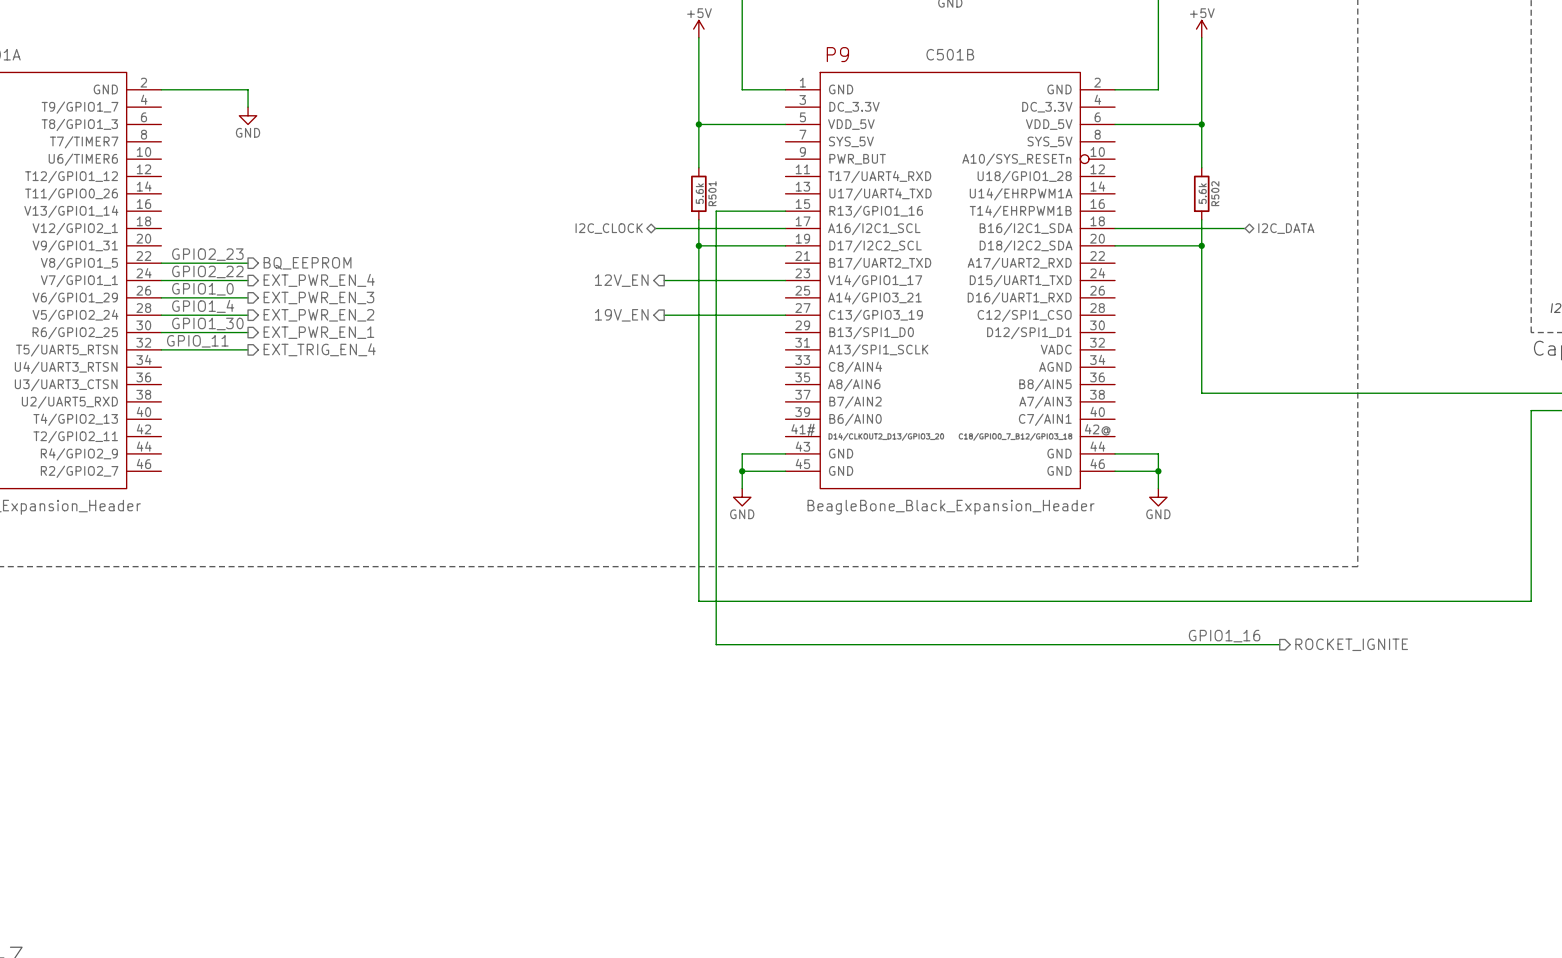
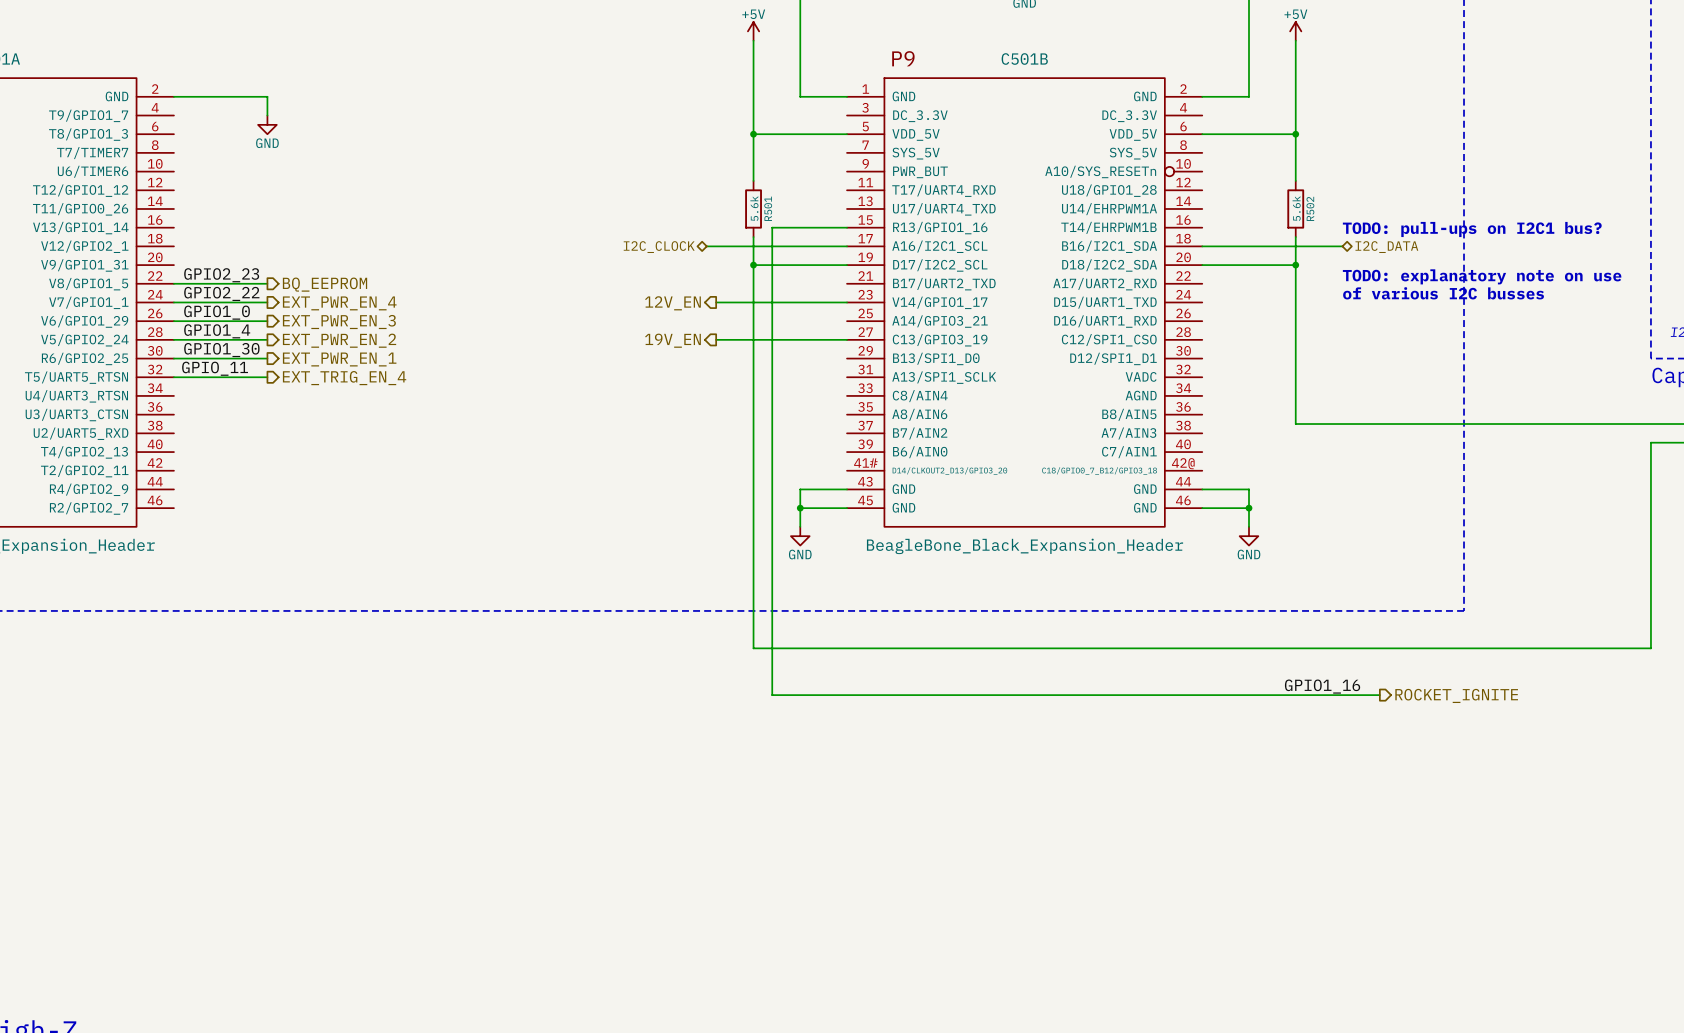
text: none -> TODO: pull-ups on I2C1 bus? (1472, 229)
text: none -> TODO: explanatory note on use (1482, 276)
text: none -> of various I2C busses (1443, 293)

